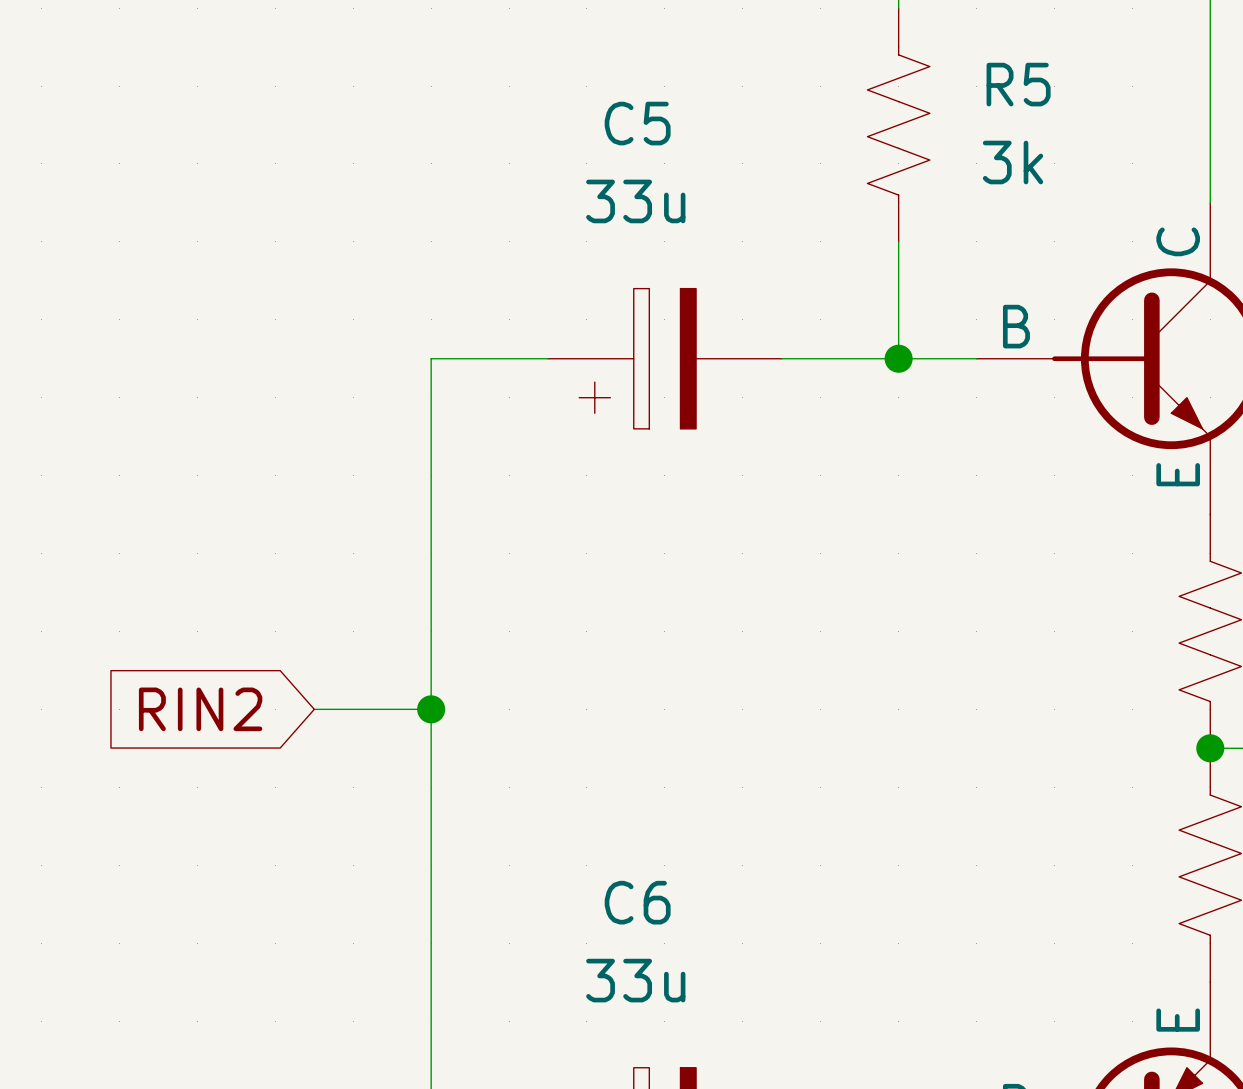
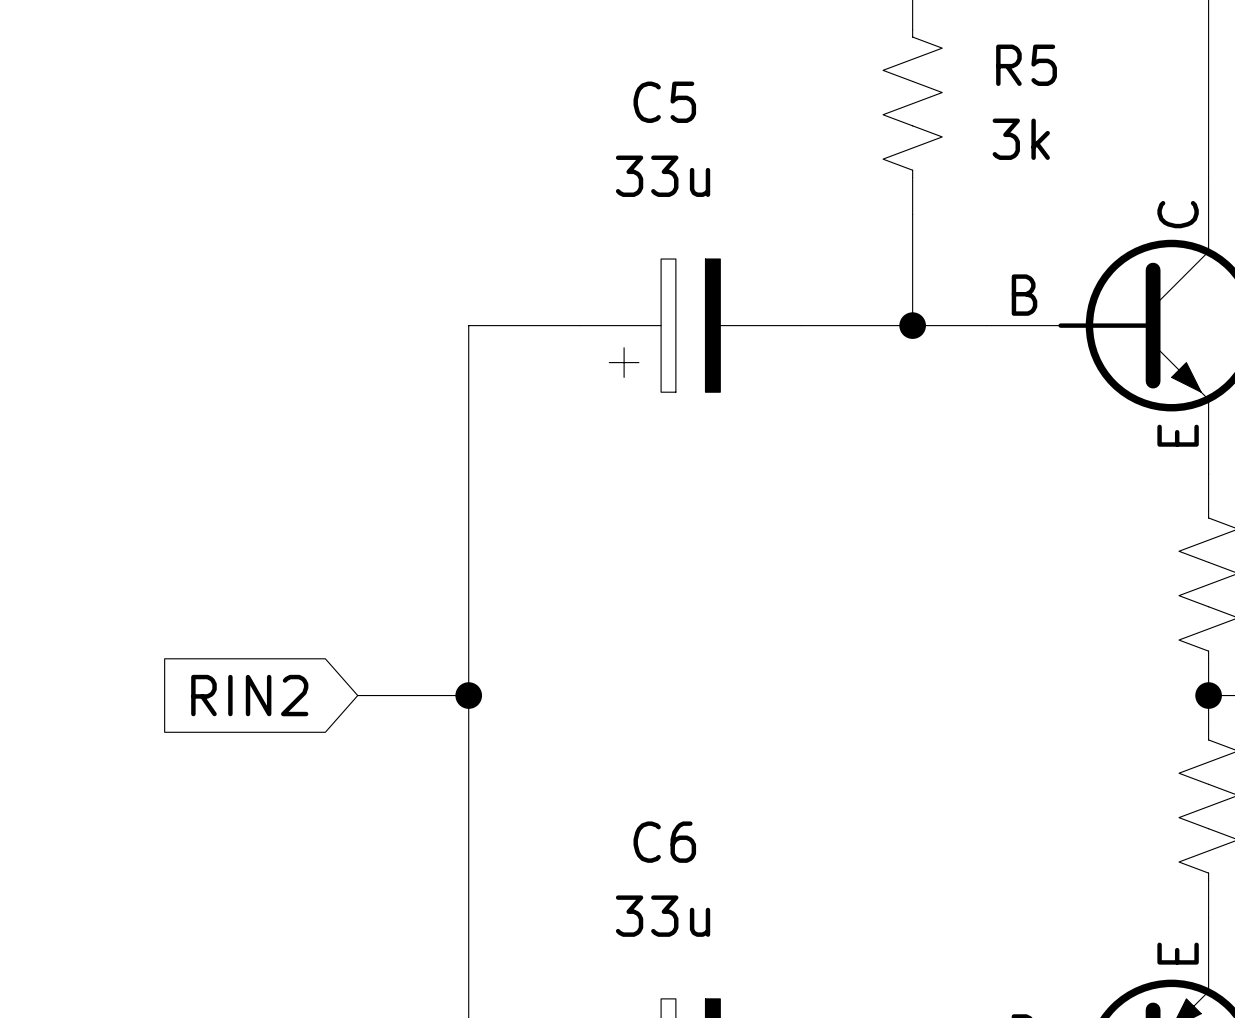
global label position: RIN2 (200, 709) -> RIN2 (249, 695)
wire: (314, 709) (431, 709) -> (357, 695) (468, 695)
junction position: (431, 709) -> (468, 695)

